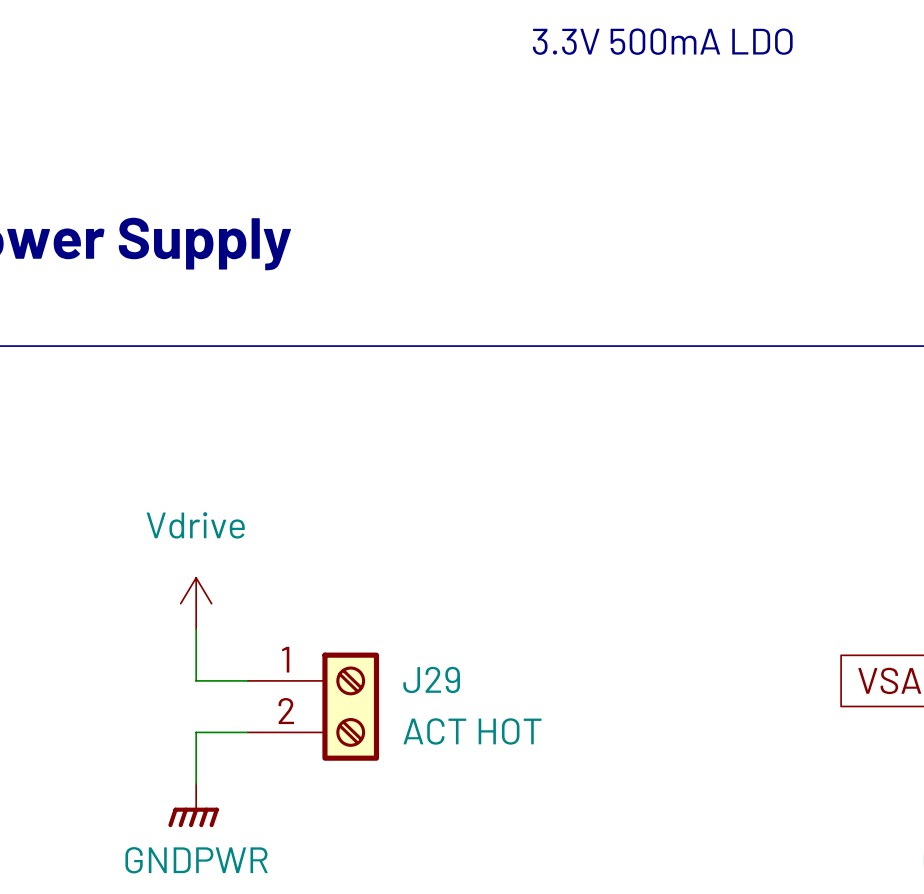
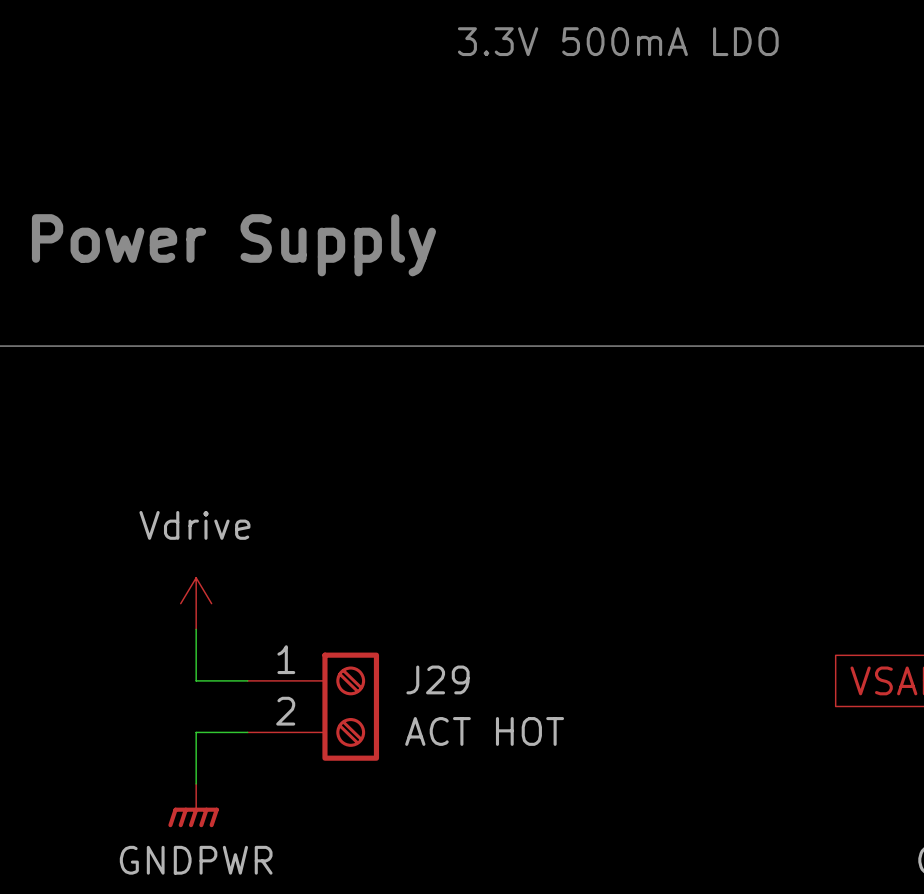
text position: 3.3V 500mA LDO (662, 41) -> 3.3V 500mA LDO (618, 41)

